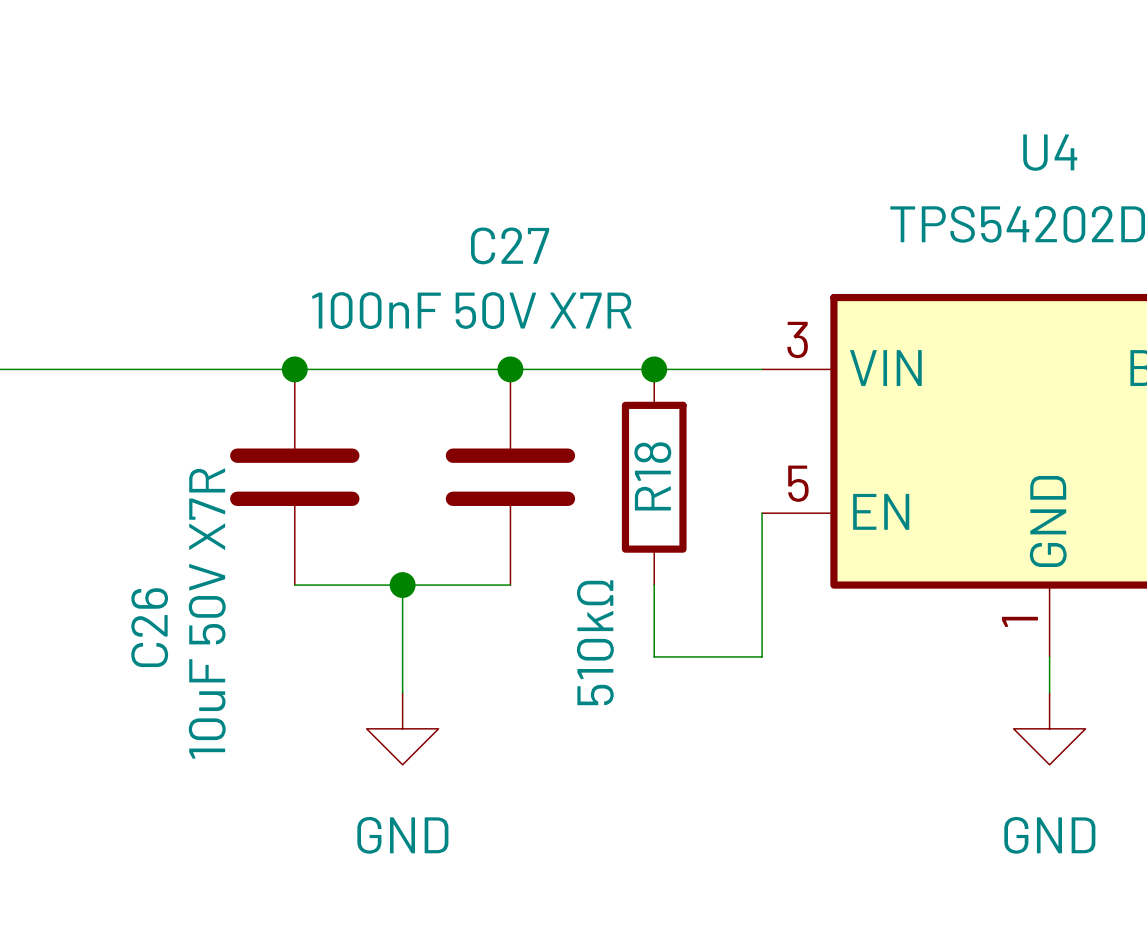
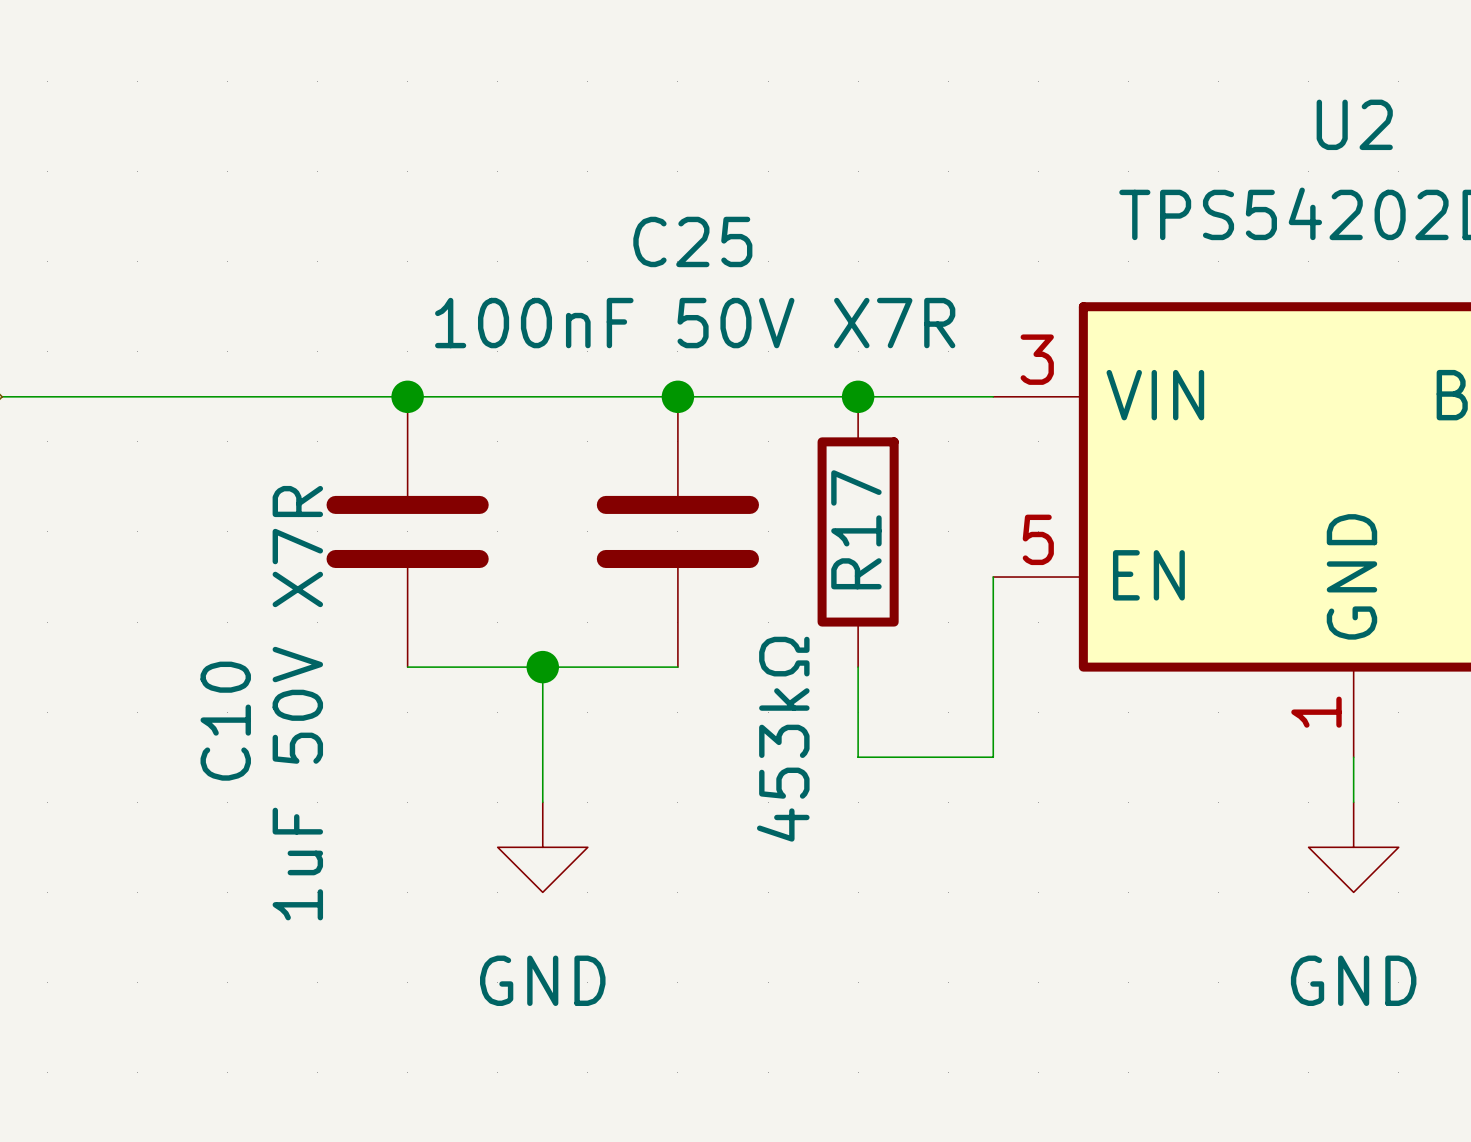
U4 name: U4 (1050, 152) -> U2 (1354, 124)
C27 name: C27 (510, 245) -> C25 (692, 241)
R18 name: R18 (652, 476) -> R17 (856, 529)
C26 value: 10uF 50V X7R (207, 613) -> 1uF 50V X7R (297, 703)
C26 name: C26 (149, 627) -> C10 (225, 721)
R18 value: 510kΩ (595, 642) -> 453kΩ (783, 739)

